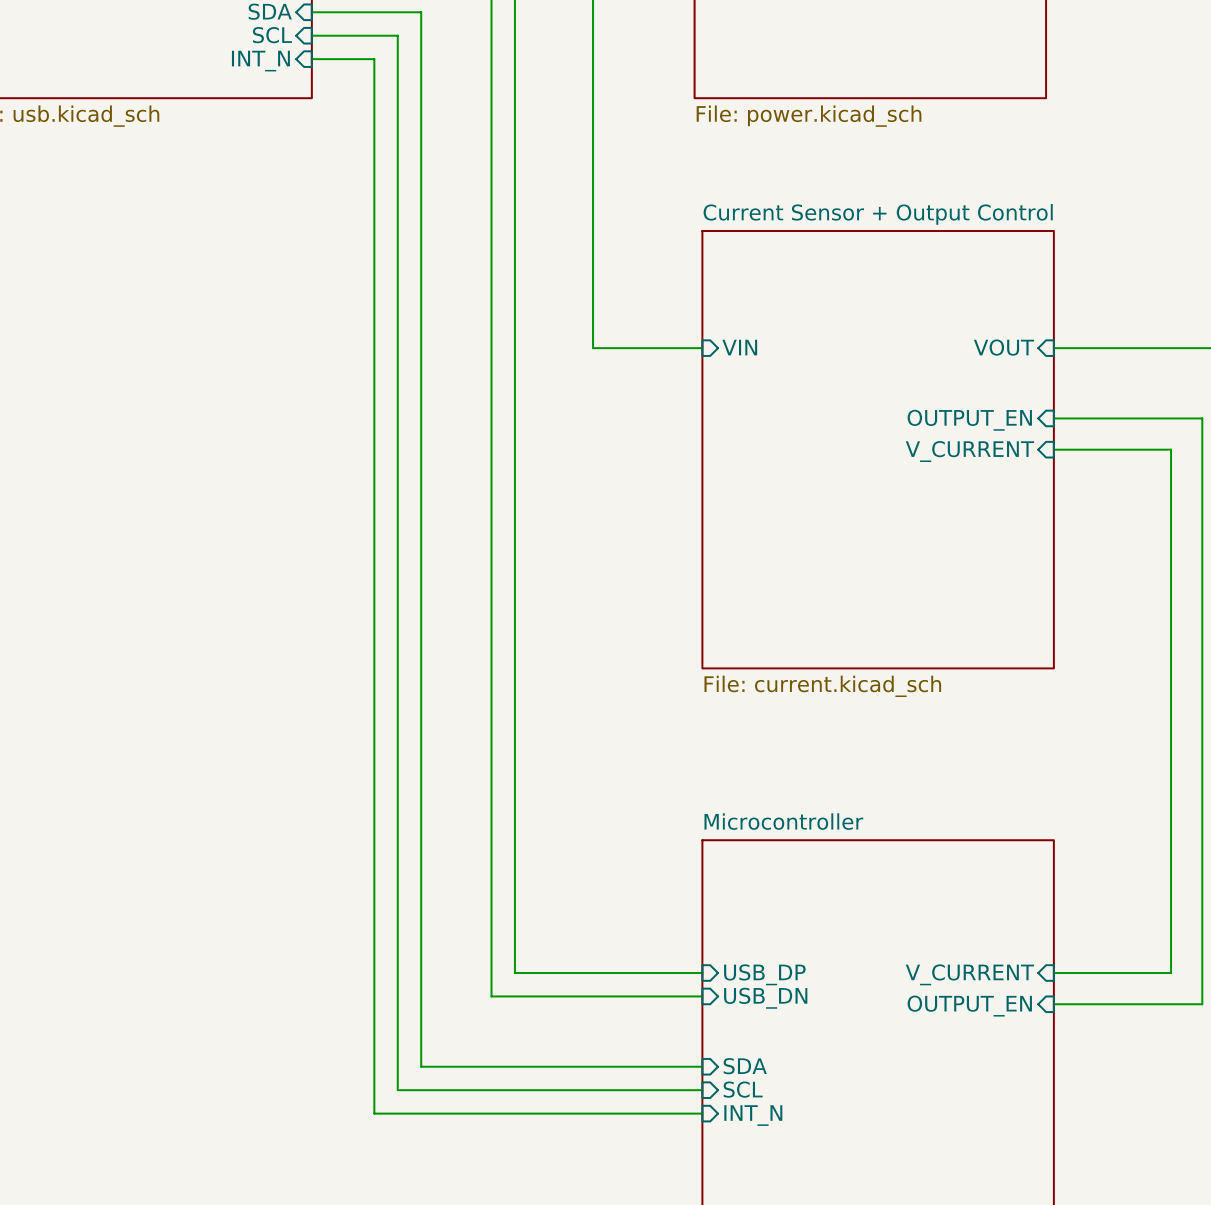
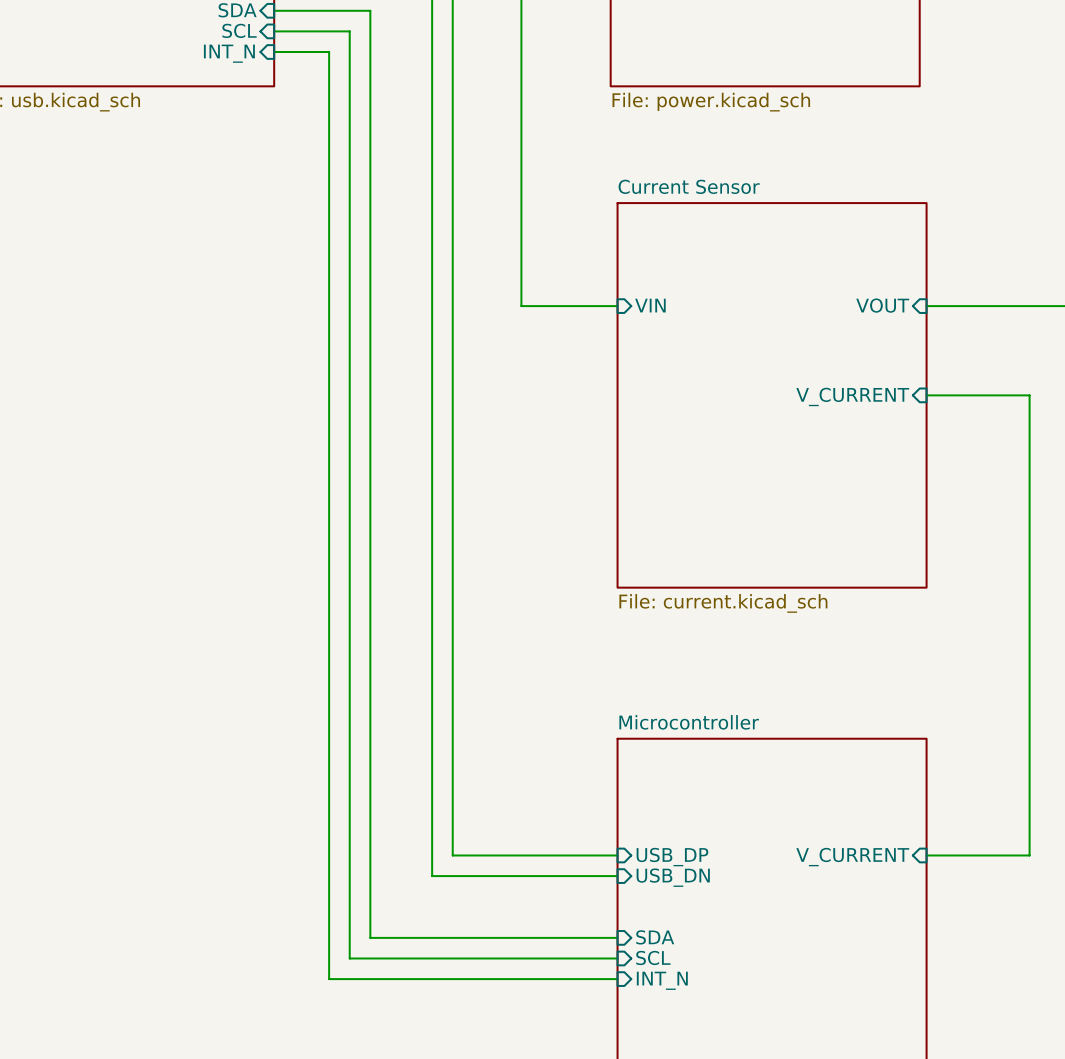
sheet Current Sensor + Output Control name: Current Sensor + Output Control (878, 214) -> Current Sensor (689, 186)
wire: (1053, 418) (1202, 418) (1202, 1004) (1053, 1004) -> none
sheet pin: OUTPUT_EN (969, 420) -> none
sheet pin: OUTPUT_EN (969, 1006) -> none

